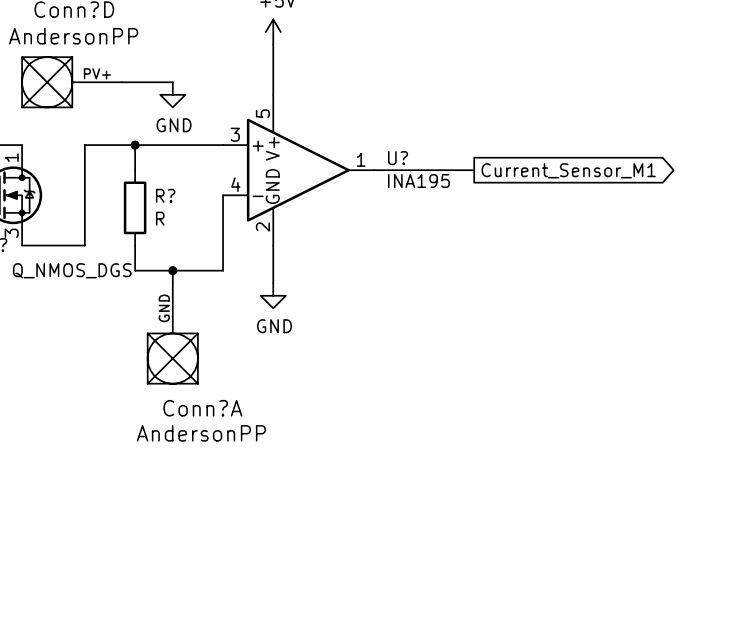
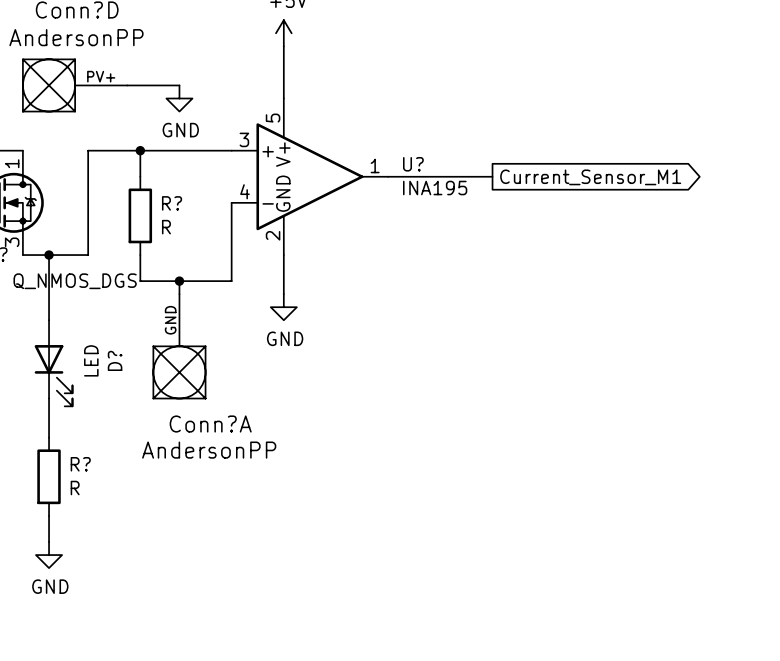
wire: none -> (49, 255) (49, 320)
junction: none -> (49, 255)
D?: none -> LED (53, 363)
wire: none -> (49, 398) (49, 437)
R?: none -> R (49, 476)
wire: none -> (49, 515) (49, 542)
power symbol: none -> GND (49, 555)

